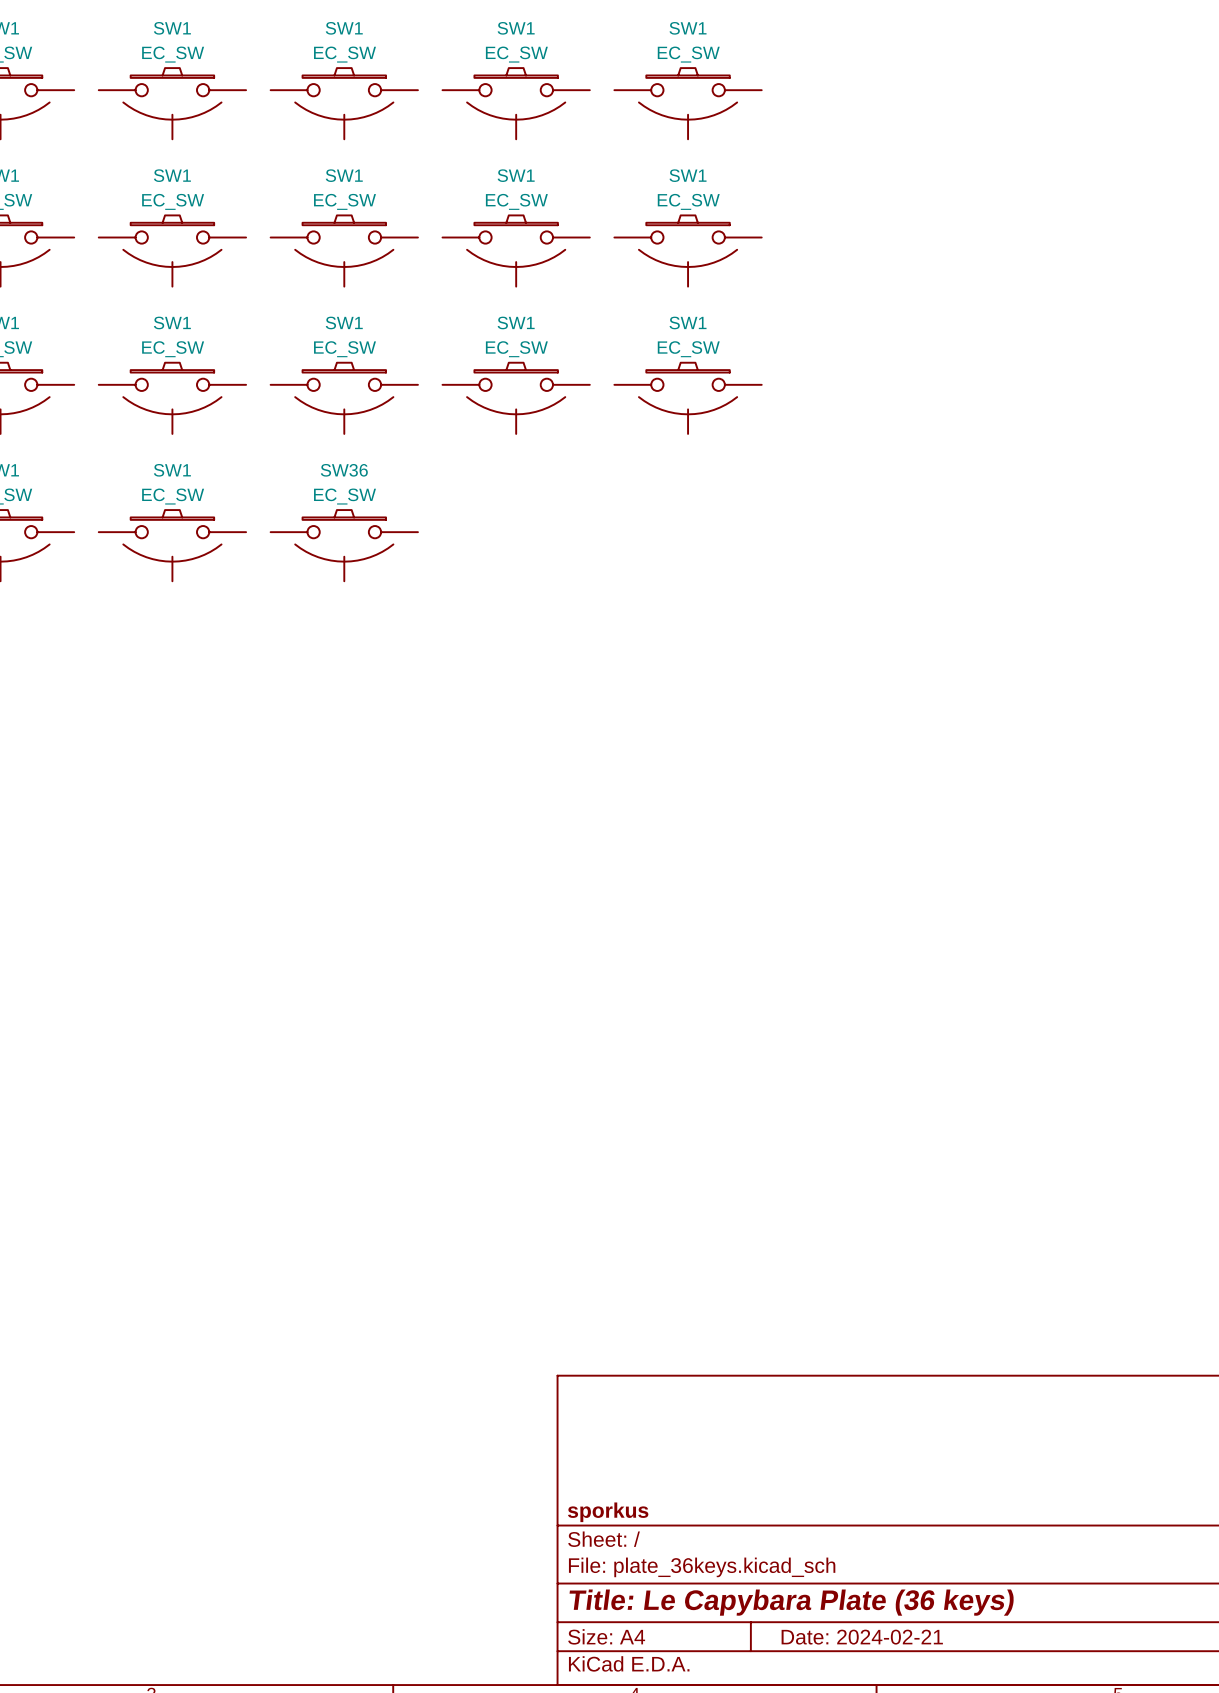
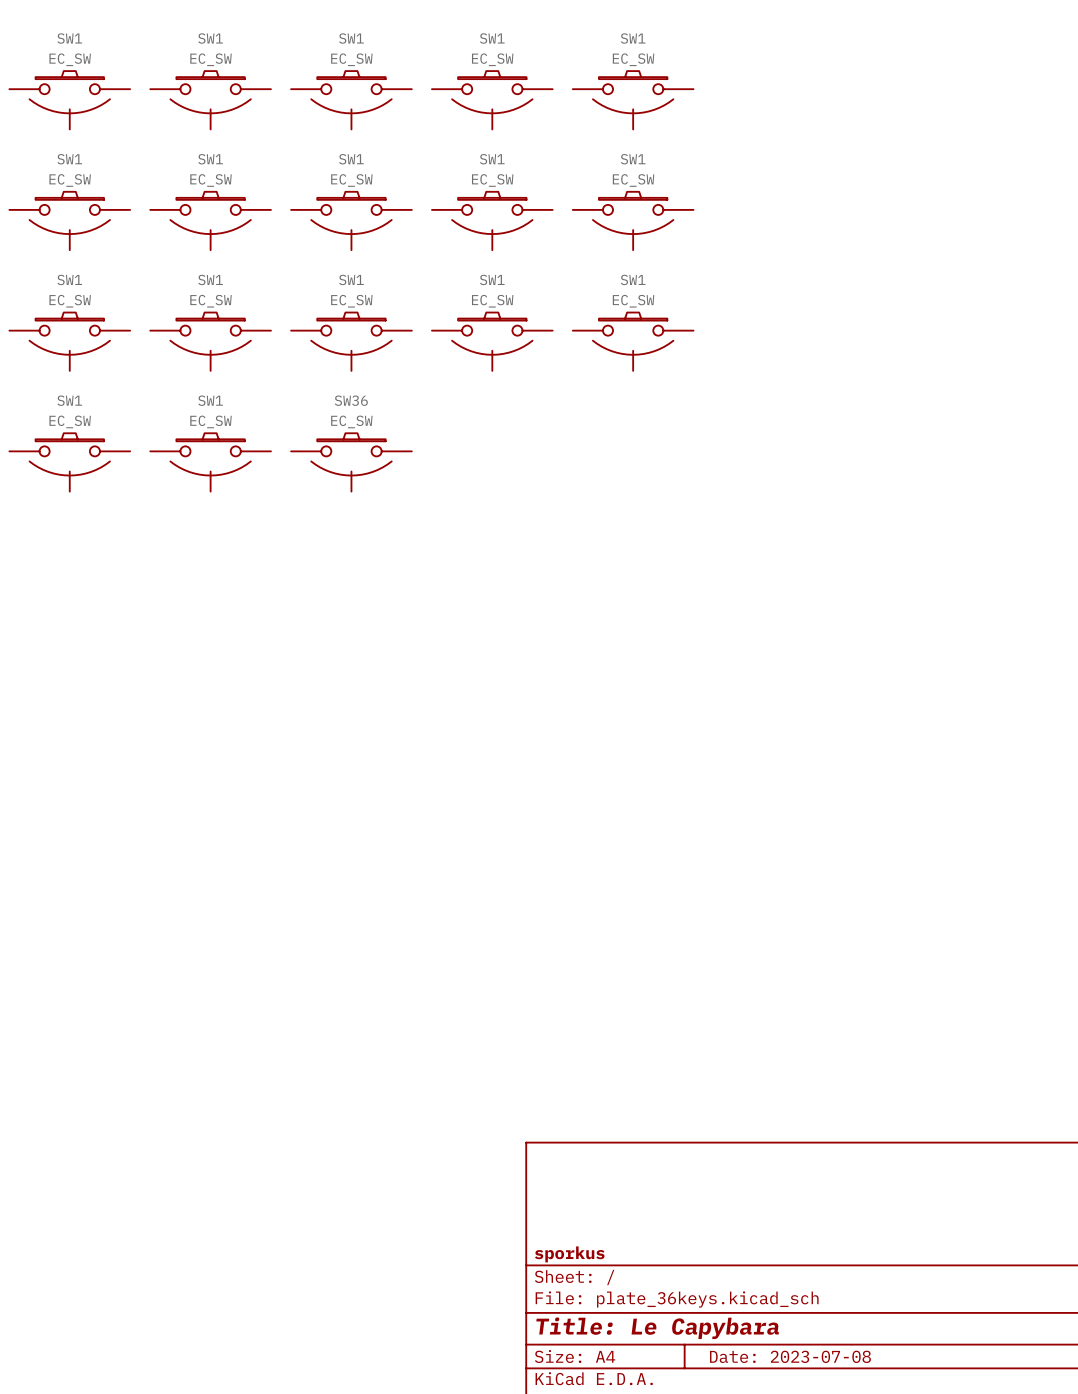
title block: Title: Le Capybara Plate (36 keys) (791, 1602) -> Title: Le Capybara (657, 1328)
title block: Date: 2024-02-21 (862, 1637) -> Date: 2023-07-08 (790, 1356)

